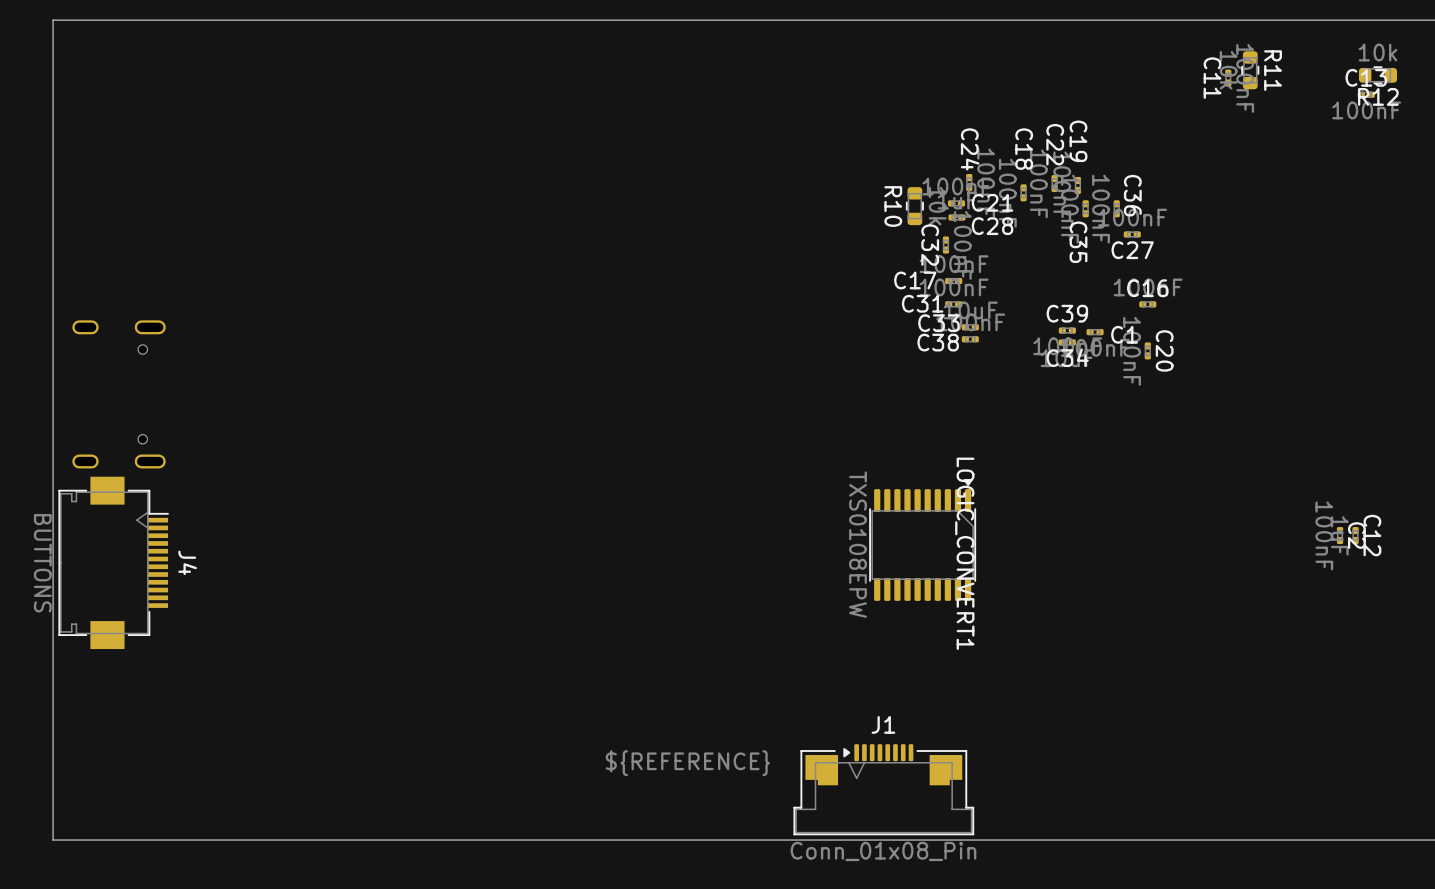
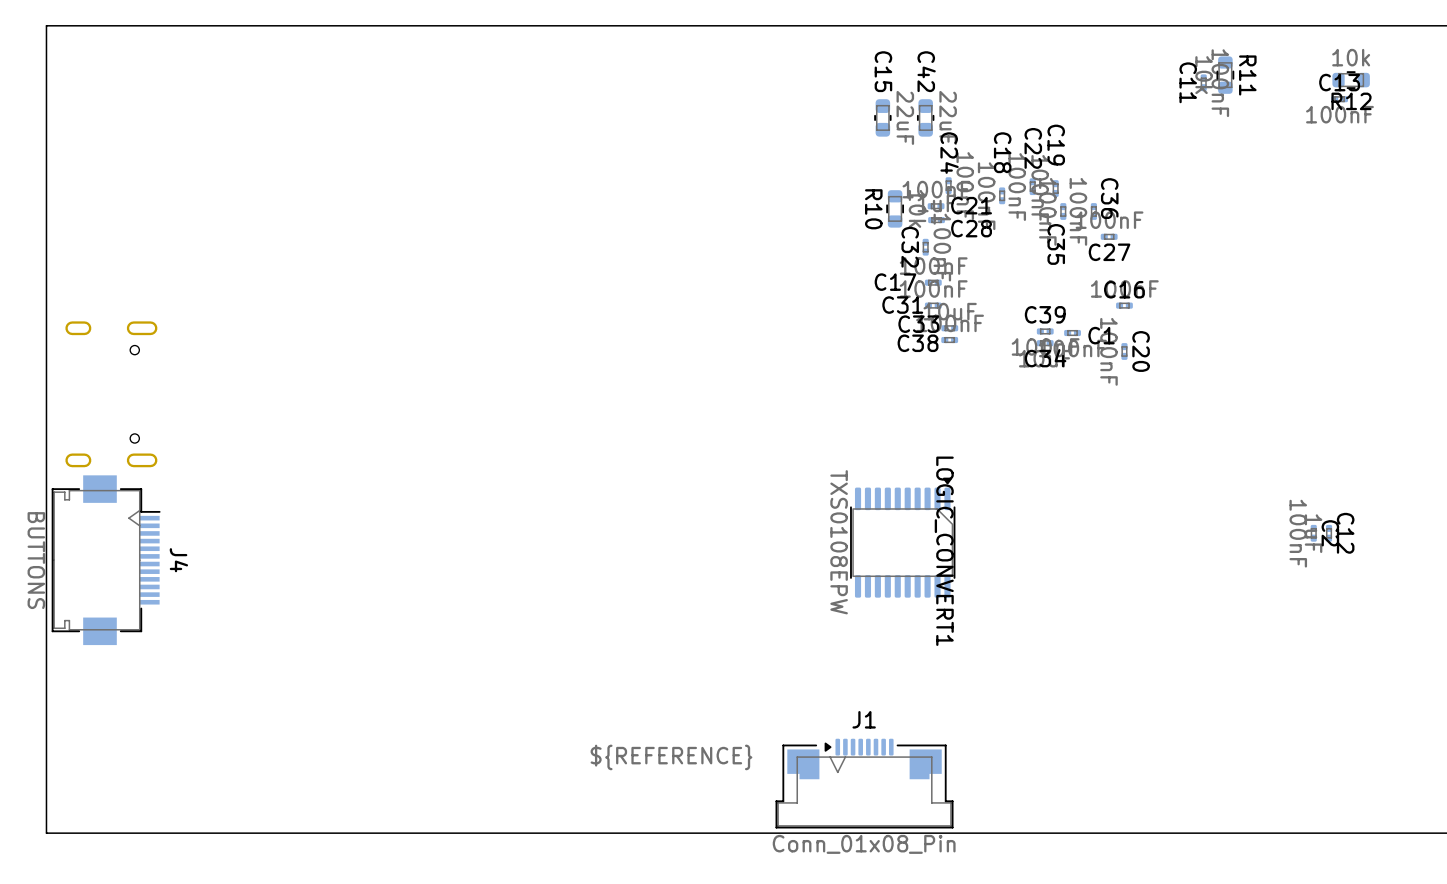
C15: none -> 22uF (882, 117)
C42: none -> 22uF (925, 117)

